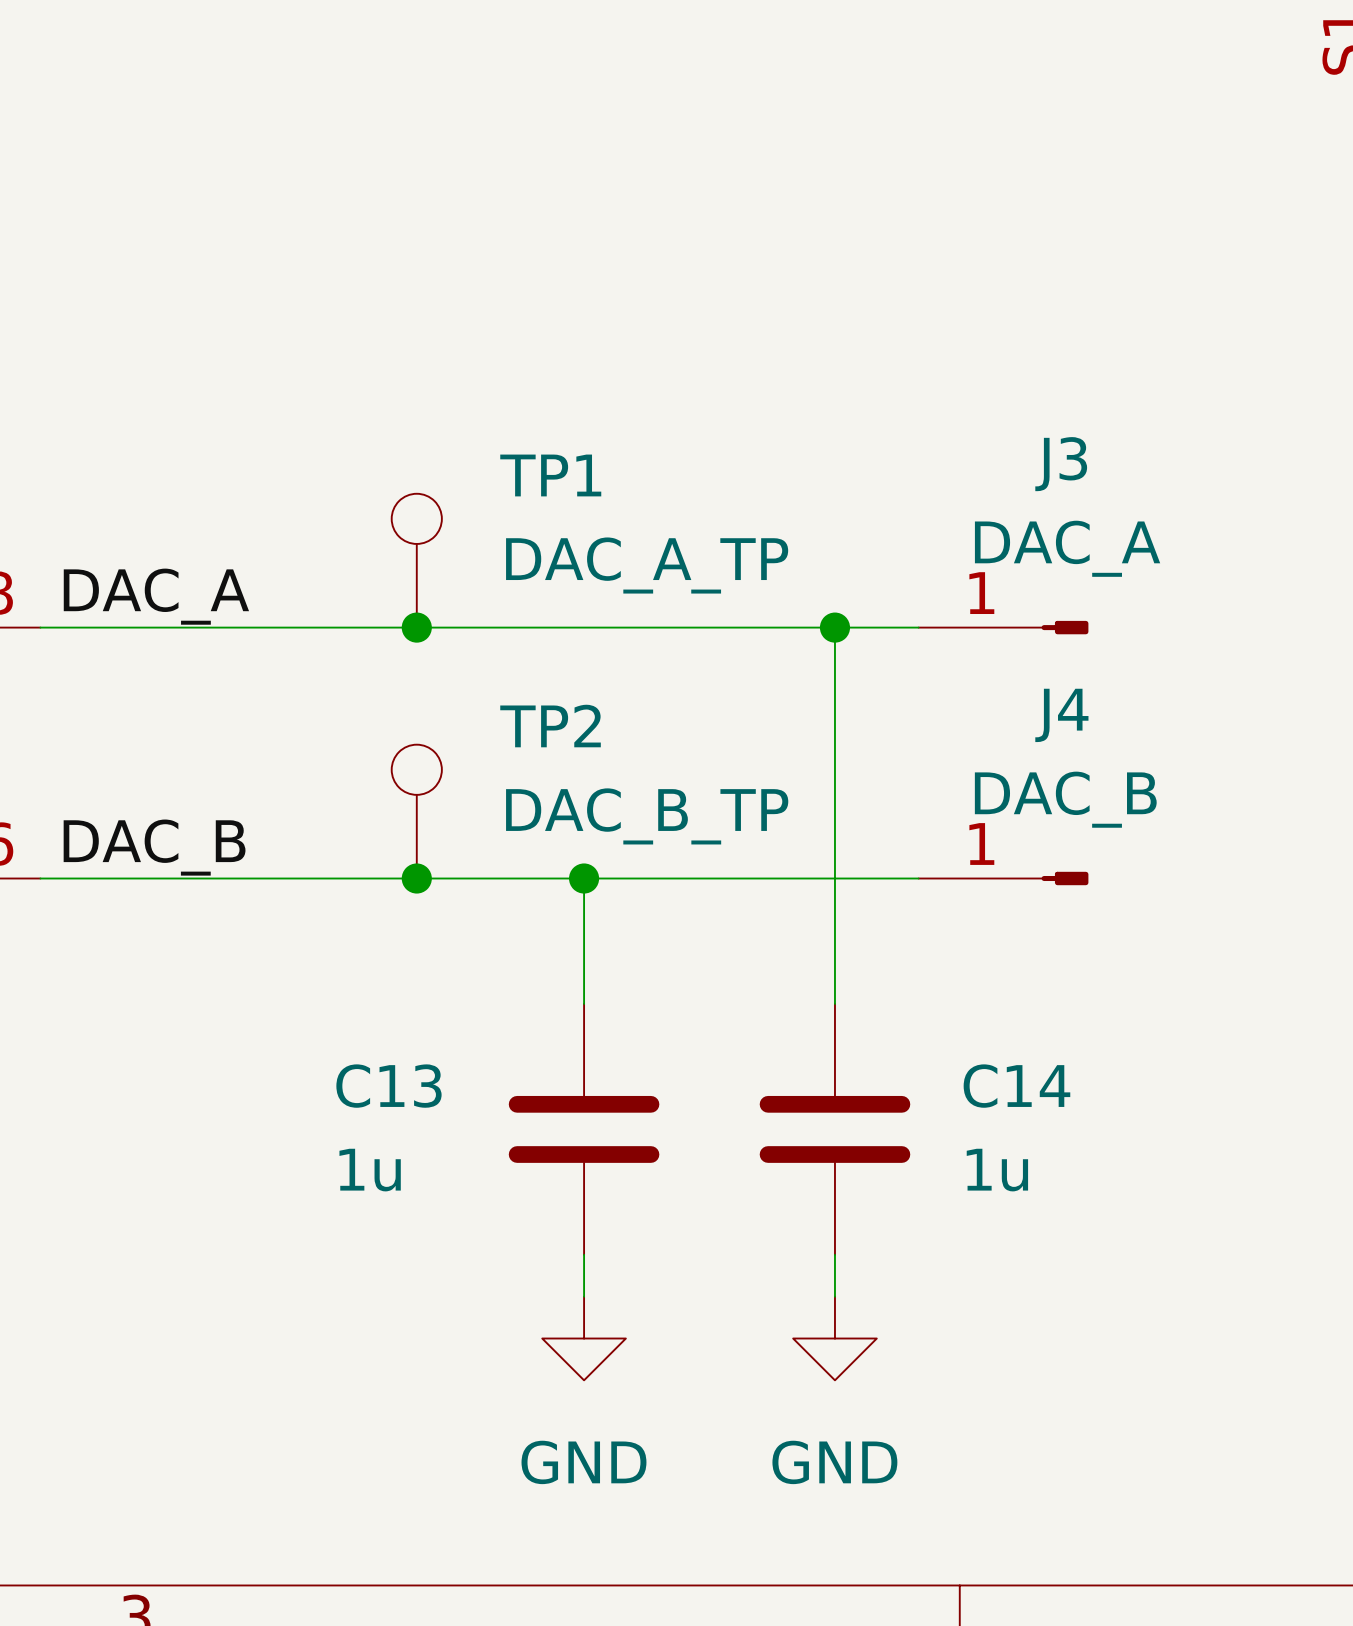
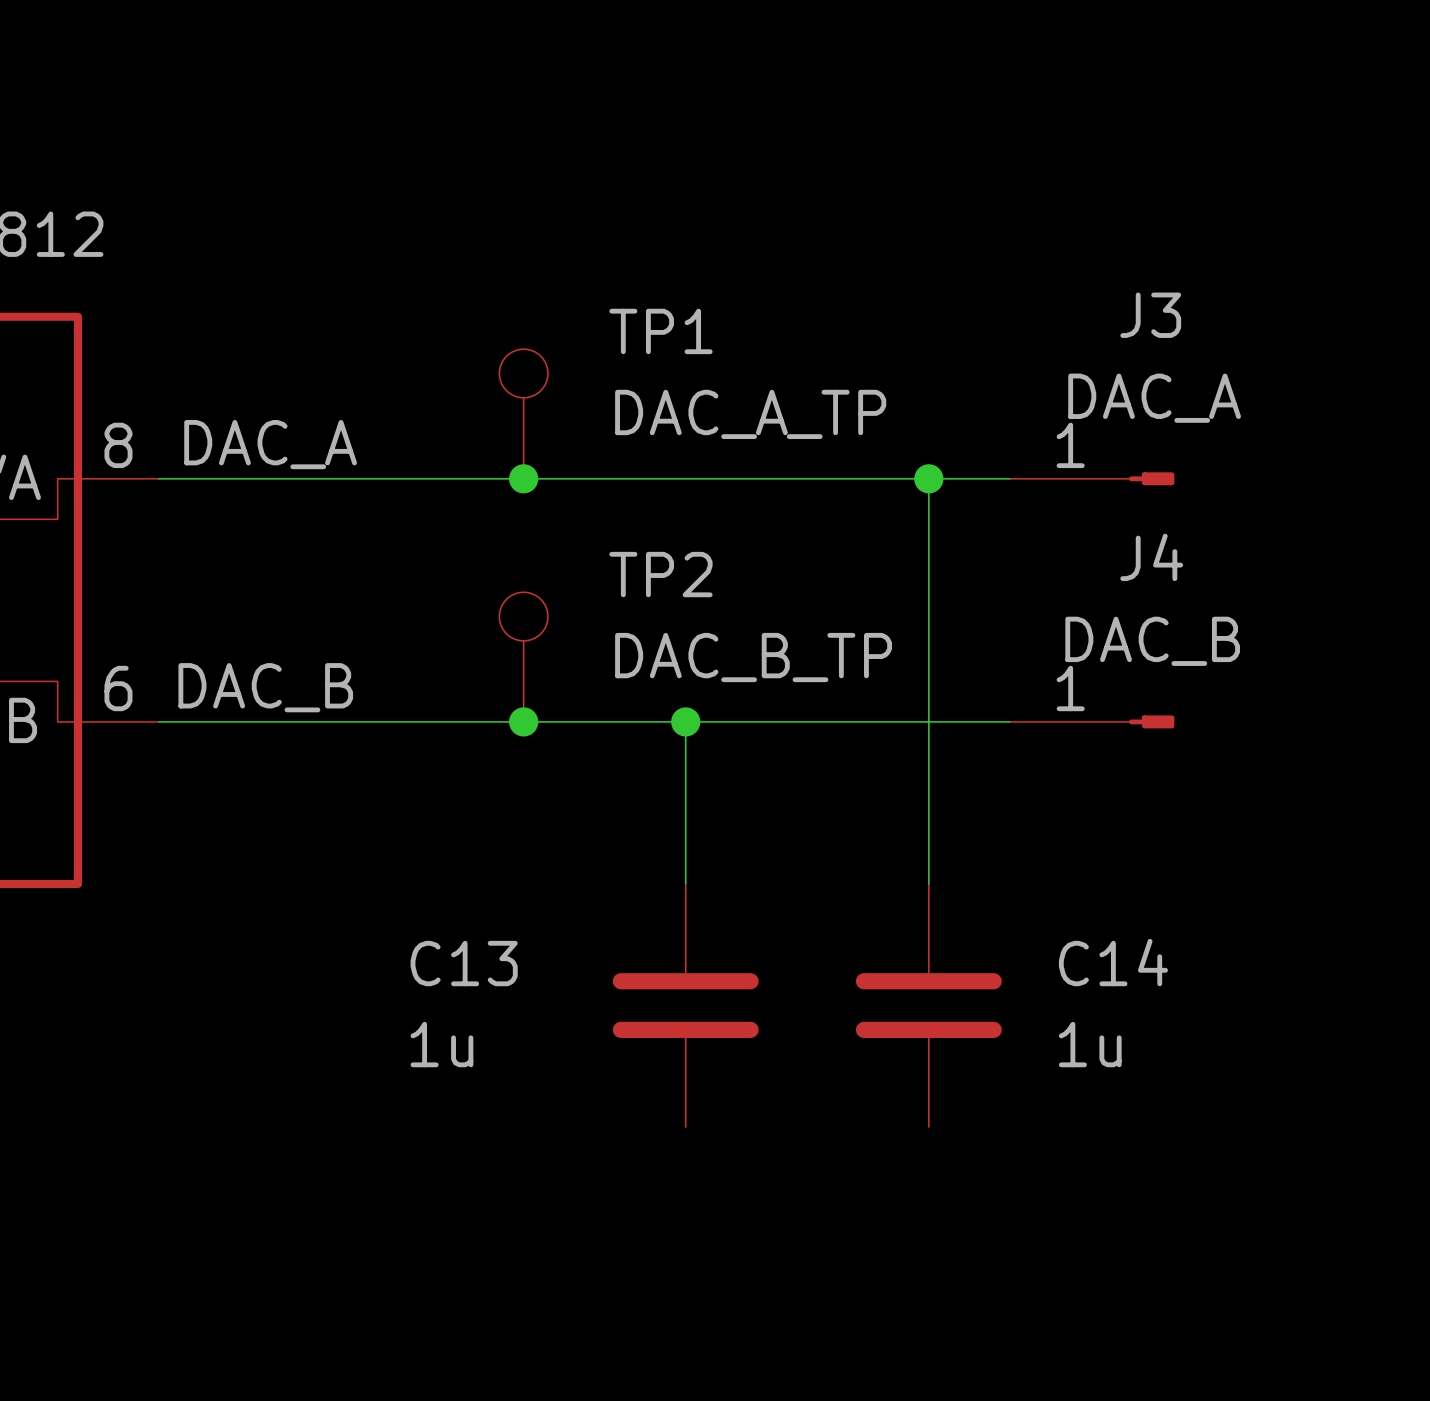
C13 name position: C13 (388, 1086) -> C13 (464, 963)
C13 position: (584, 1129) -> (685, 1005)
C14 position: (834, 1129) -> (928, 1005)
C13 value position: 1u (370, 1170) -> 1u (441, 1044)
power symbol: GND (584, 1338) -> none
power symbol: GND (834, 1338) -> none

